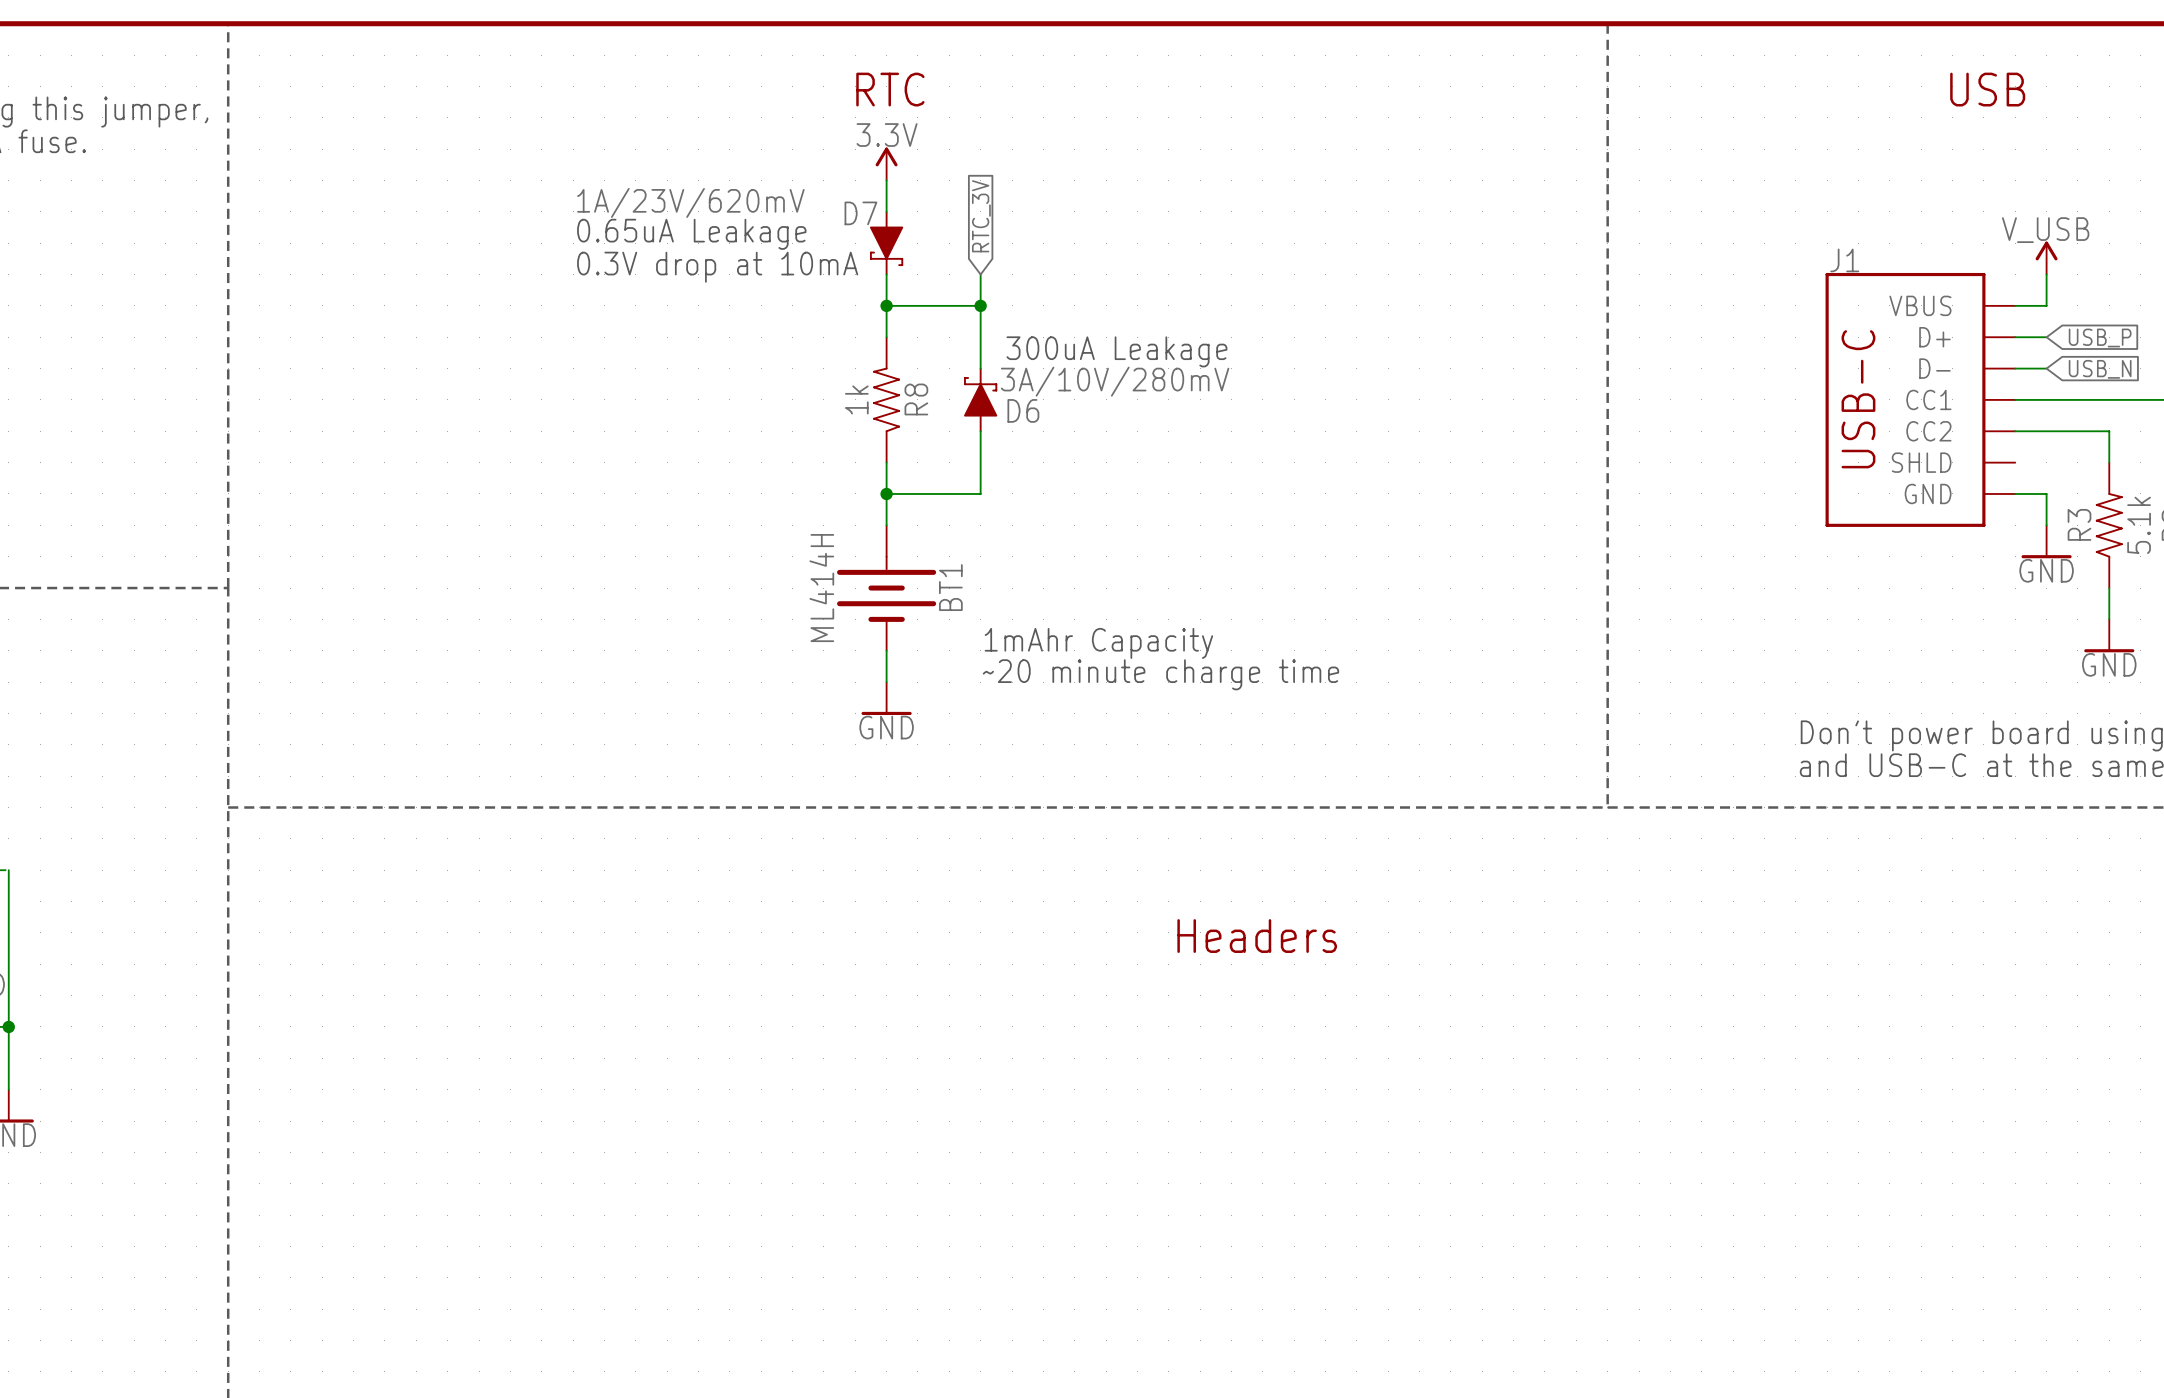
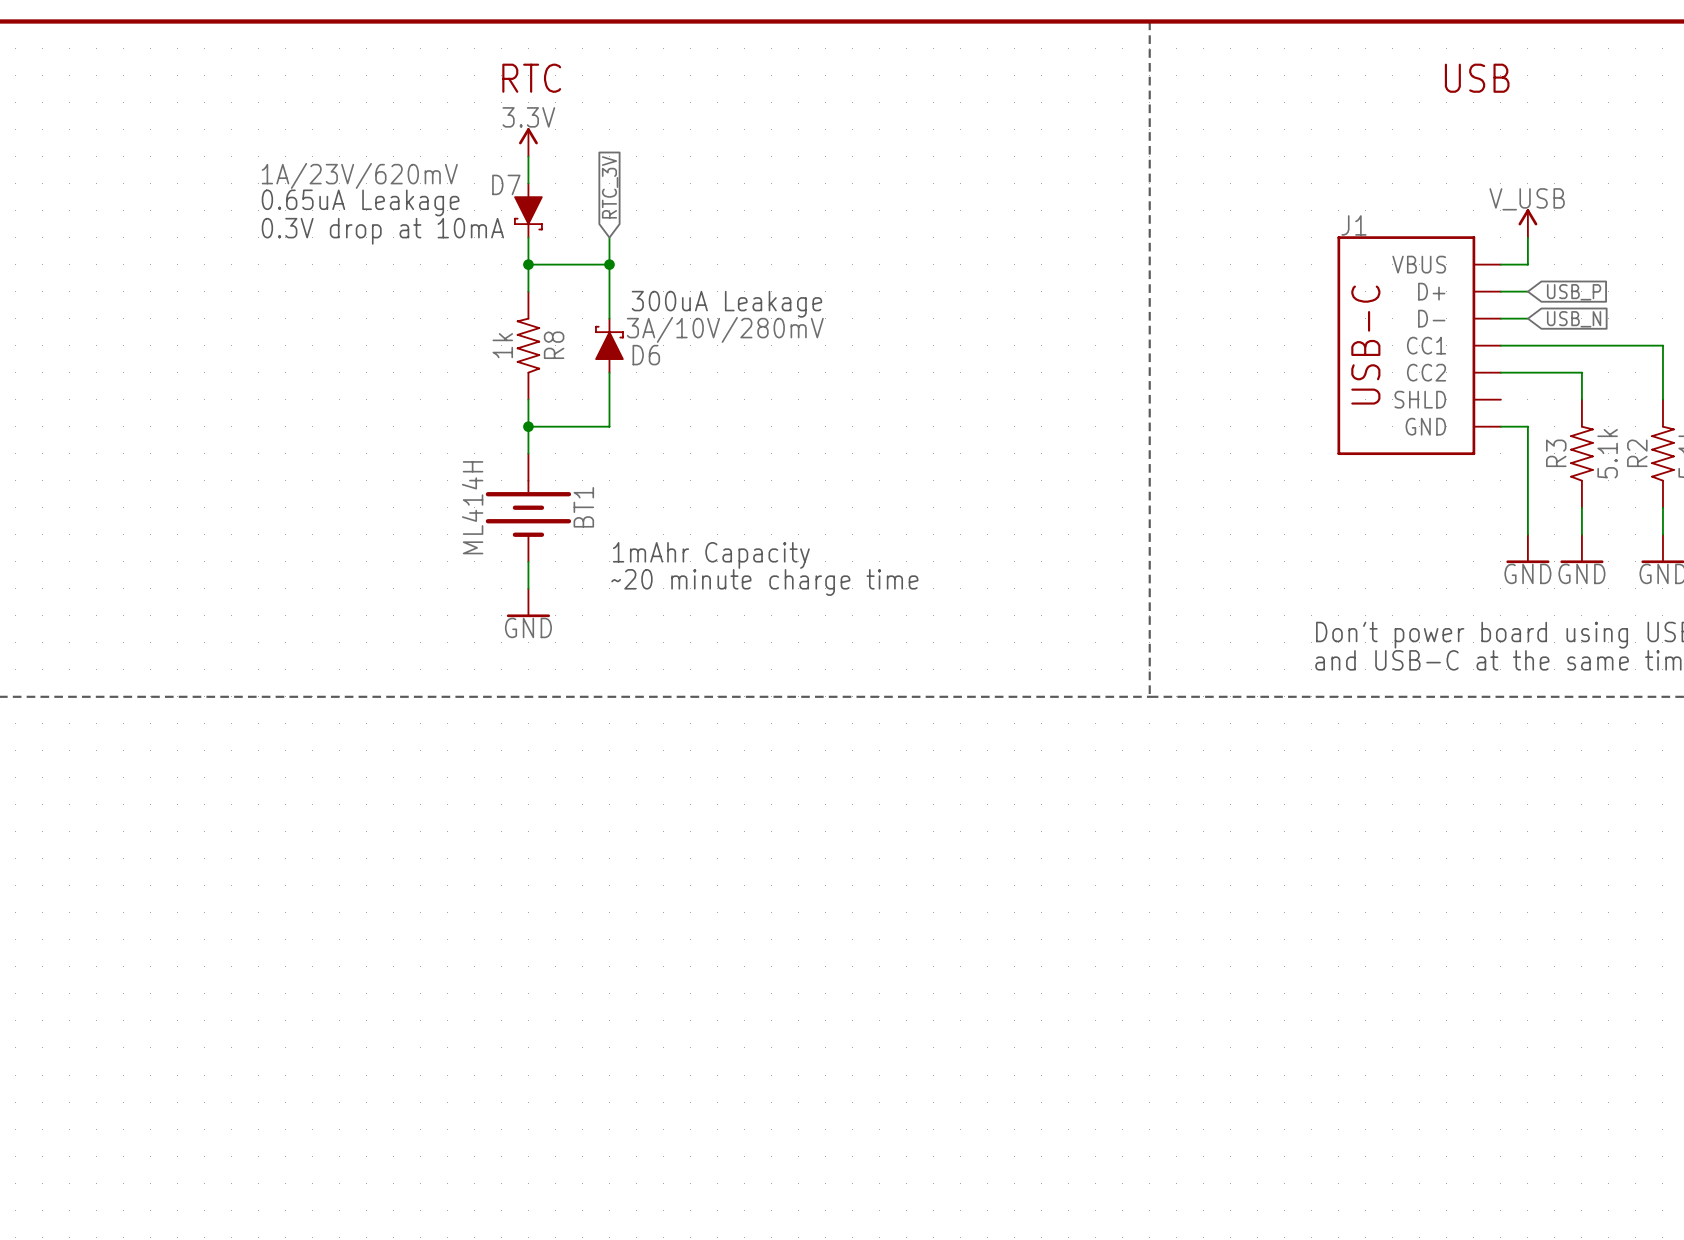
wire: none -> (1527, 453) (1527, 534)
power symbol position: GND (2046, 541) -> GND (1527, 548)
text: Headers (1257, 936) -> none

